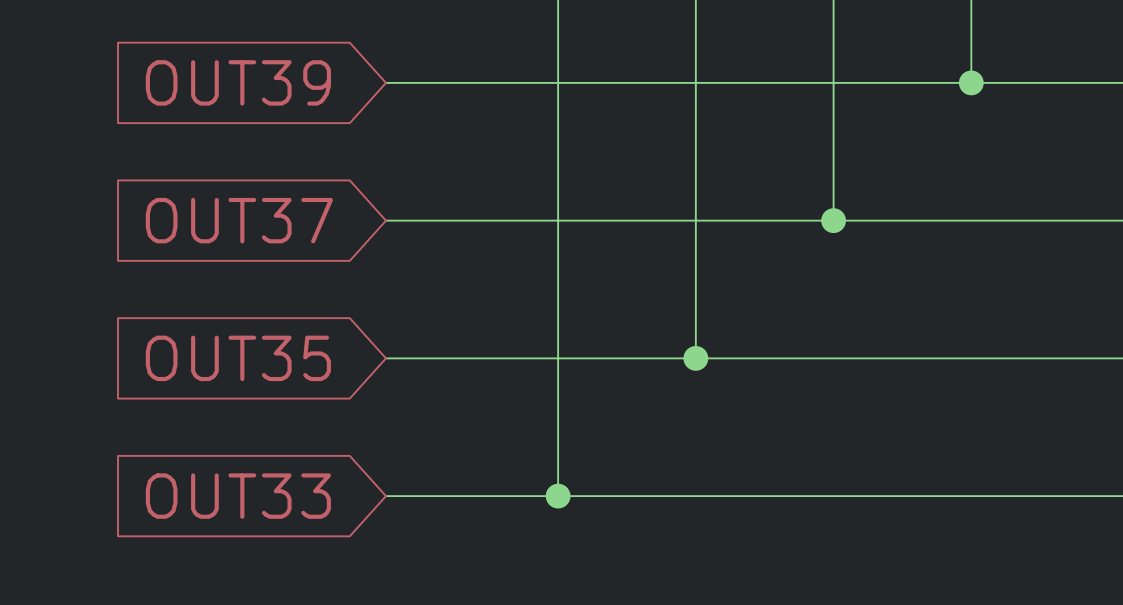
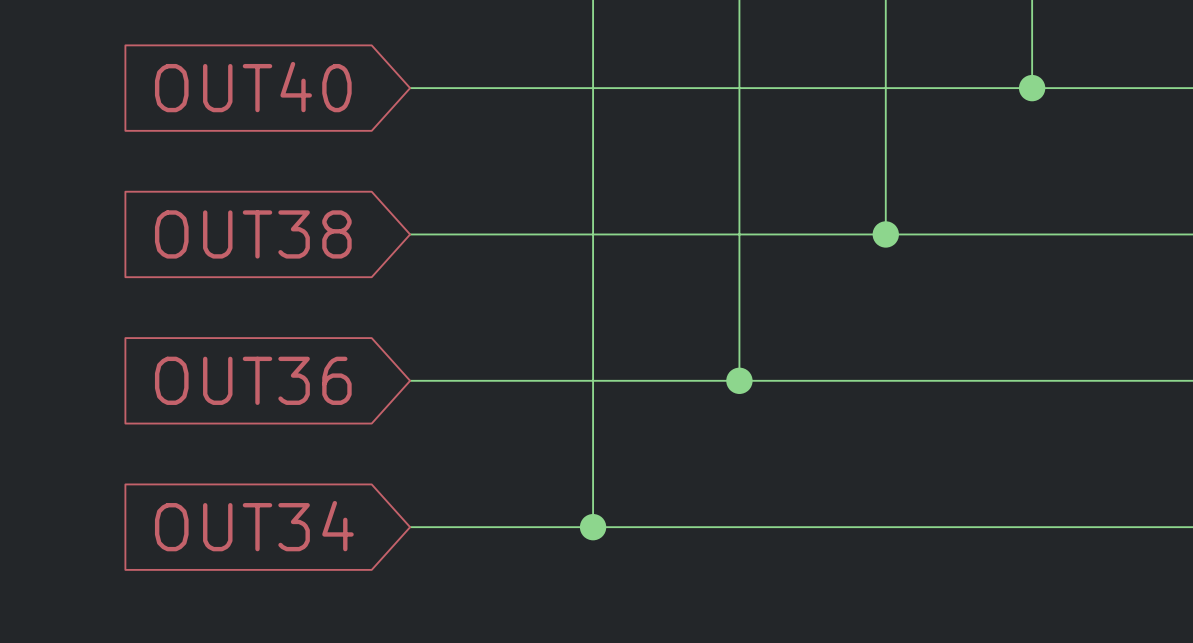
global label: OUT39 (238, 82) -> OUT40 (253, 87)
global label: OUT37 (239, 220) -> OUT38 (253, 234)
global label: OUT35 (238, 358) -> OUT36 (253, 380)
global label: OUT33 (238, 496) -> OUT34 (254, 526)

